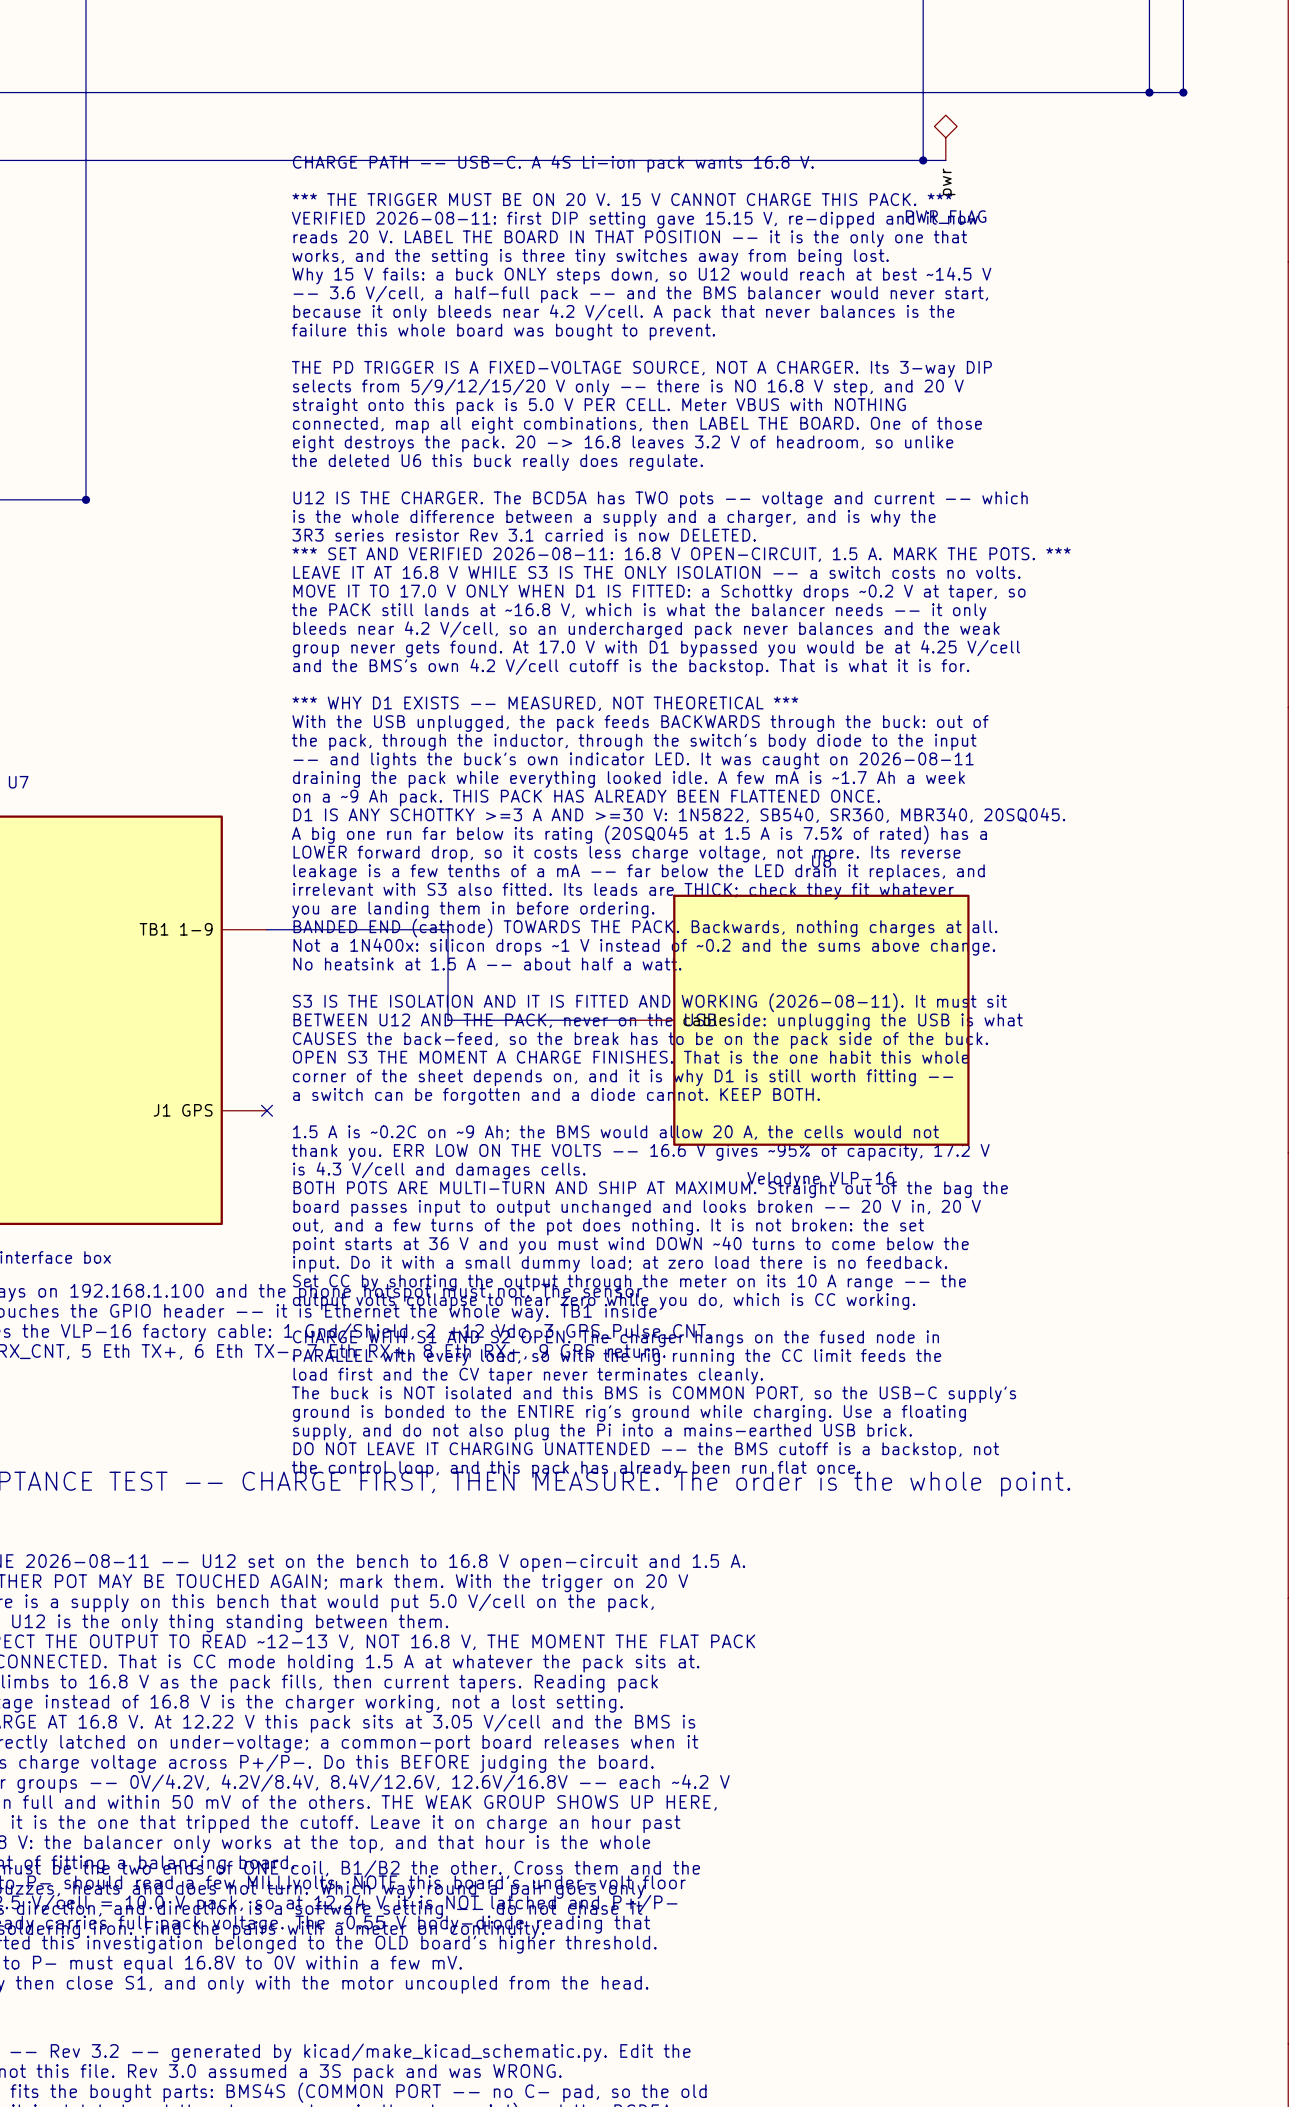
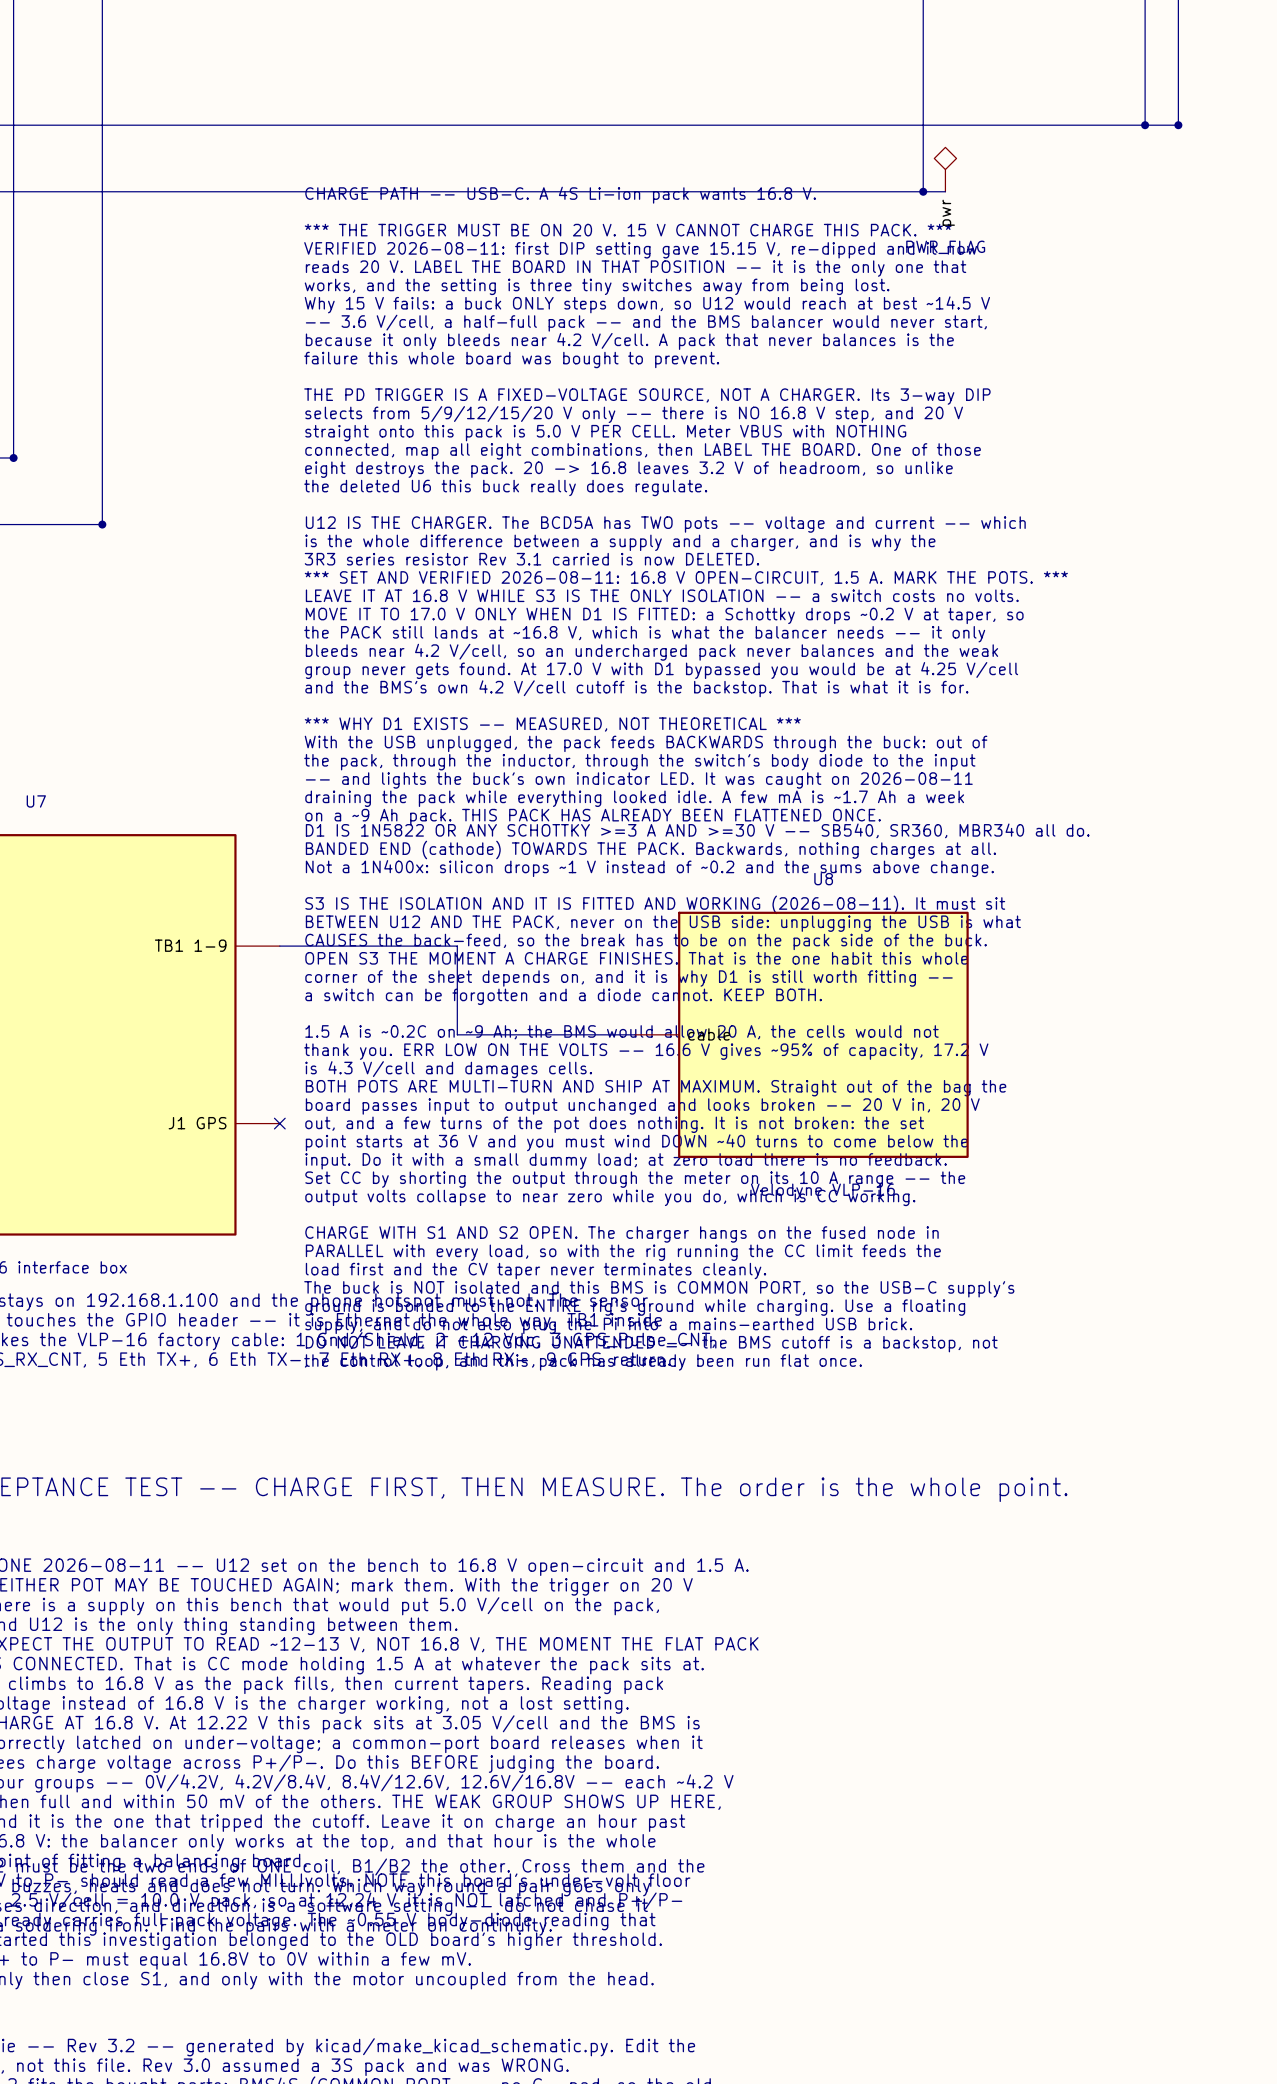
text: D1 IS ANY SCHOTTKY >=3 A AND >=30 V: 1N5822, SB540, SR360, MBR340, 20SQ045. (679, 815) -> D1 IS 1N5822 OR ANY SCHOTTKY >=3 A AND >=30 V -- SB540, SR360, MBR340 all do. (697, 830)
text: A big one run far below its rating (20SQ045 at 1.5 A is 7.5% of rated) has a (639, 834) -> none
text: LOWER forward drop, so it costs less charge voltage, not more. Its reverse (626, 854) -> none
text: leakage is a few tenths of a mA -- far below the LED drain it replaces, and (639, 872) -> none
text: irrelevant with S3 also fitted. Its leads are THICK; check they fit whatever (623, 891) -> none
text: you are landing them in before ordering. (473, 910) -> none
text position: BANDED END (cathode) TOWARDS THE PACK. Backwards, nothing charges at all. (645, 928) -> BANDED END (cathode) TOWARDS THE PACK. Backwards, nothing charges at all. (650, 849)
text position: Not a 1N400x: silicon drops ~1 V instead of ~0.2 and the sums above change. (644, 947) -> Not a 1N400x: silicon drops ~1 V instead of ~0.2 and the sums above change. (649, 868)
text: No heatsink at 1.5 A -- about half a watt. (487, 964) -> none
text position: S3 IS THE ISOLATION AND IT IS FITTED AND WORKING (2026-08-11). It must sit (649, 1002) -> S3 IS THE ISOLATION AND IT IS FITTED AND WORKING (2026-08-11). It must sit (655, 904)
text position: BETWEEN U12 AND THE PACK, never on the USB side: unplugging the USB is what (658, 1021) -> BETWEEN U12 AND THE PACK, never on the USB side: unplugging the USB is what (663, 923)
text position: CAUSES the back-feed, so the break has to be on the pack side of the buck. (640, 1040) -> CAUSES the back-feed, so the break has to be on the pack side of the buck. (646, 941)
text position: OPEN S3 THE MOMENT A CHARGE FINISHES. That is the one habit this whole (630, 1057) -> OPEN S3 THE MOMENT A CHARGE FINISHES. That is the one habit this whole (636, 958)
text position: corner of the sheet depends on, and it is why D1 is still worth fitting -- (623, 1077) -> corner of the sheet depends on, and it is why D1 is still worth fitting -- (629, 978)
text position: a switch can be forgotten and a diode cannot. KEEP BOTH. (556, 1096) -> a switch can be forgotten and a diode cannot. KEEP BOTH. (563, 996)
text position: 1.5 A is ~0.2C on ~9 Ah; the BMS would allow 20 A, the cells would not (615, 1132) -> 1.5 A is ~0.2C on ~9 Ah; the BMS would allow 20 A, the cells would not (621, 1032)
text position: thank you. ERR LOW ON THE VOLTS -- 16.6 V gives ~95% of capacity, 17.2 V (640, 1152) -> thank you. ERR LOW ON THE VOLTS -- 16.6 V gives ~95% of capacity, 17.2 V (646, 1051)
text position: is 4.3 V/cell and damages cells. (439, 1170) -> is 4.3 V/cell and damages cells. (448, 1069)
text position: BOTH POTS ARE MULTI-TURN AND SHIP AT MAXIMUM. Straight out of the bag the (650, 1189) -> BOTH POTS ARE MULTI-TURN AND SHIP AT MAXIMUM. Straight out of the bag the (656, 1088)
text position: board passes input to output unchanged and looks broken -- 20 V in, 20 V (637, 1208) -> board passes input to output unchanged and looks broken -- 20 V in, 20 V (642, 1106)
text position: out, and a few turns of the pot does nothing. It is not broken: the set (608, 1226) -> out, and a few turns of the pot does nothing. It is not broken: the set (614, 1124)
text position: point starts at 36 V and you must wind DOWN ~40 turns to come below the (631, 1245) -> point starts at 36 V and you must wind DOWN ~40 turns to come below the (636, 1142)
text position: input. Do it with a small dummy load; at zero load there is no feedback. (620, 1264) -> input. Do it with a small dummy load; at zero load there is no feedback. (626, 1161)
text position: Set CC by shorting the output through the meter on its 10 A range -- the (629, 1282) -> Set CC by shorting the output through the meter on its 10 A range -- the (635, 1179)
text position: output volts collapse to near zero while you do, which is CC working. (604, 1301) -> output volts collapse to near zero while you do, which is CC working. (610, 1197)
text position: CHARGE WITH S1 AND S2 OPEN. The charger hangs on the fused node in (615, 1338) -> CHARGE WITH S1 AND S2 OPEN. The charger hangs on the fused node in (621, 1234)
text position: PARALLEL with every load, so with the rig running the CC limit feeds the (617, 1357) -> PARALLEL with every load, so with the rig running the CC limit feeds the (623, 1252)
text position: load first and the CV taper never terminates cleanly. (528, 1376) -> load first and the CV taper never terminates cleanly. (536, 1271)
text position: The buck is NOT isolated and this BMS is COMMON PORT, so the USB-C supply's (654, 1394) -> The buck is NOT isolated and this BMS is COMMON PORT, so the USB-C supply's (659, 1289)
text position: ground is bonded to the ENTIRE rig's ground while charging. Use a floating (629, 1413) -> ground is bonded to the ENTIRE rig's ground while charging. Use a floating (635, 1307)
text position: supply, and do not also plug the Pi into a mains-earthed USB brick. (602, 1432) -> supply, and do not also plug the Pi into a mains-earthed USB brick. (608, 1325)
text position: DO NOT LEAVE IT CHARGING UNATTENDED -- the BMS cutoff is a backstop, not (646, 1450) -> DO NOT LEAVE IT CHARGING UNATTENDED -- the BMS cutoff is a backstop, not (651, 1344)
text position: the control loop, and this pack has already been run flat once. (576, 1469) -> the control loop, and this pack has already been run flat once. (583, 1362)

